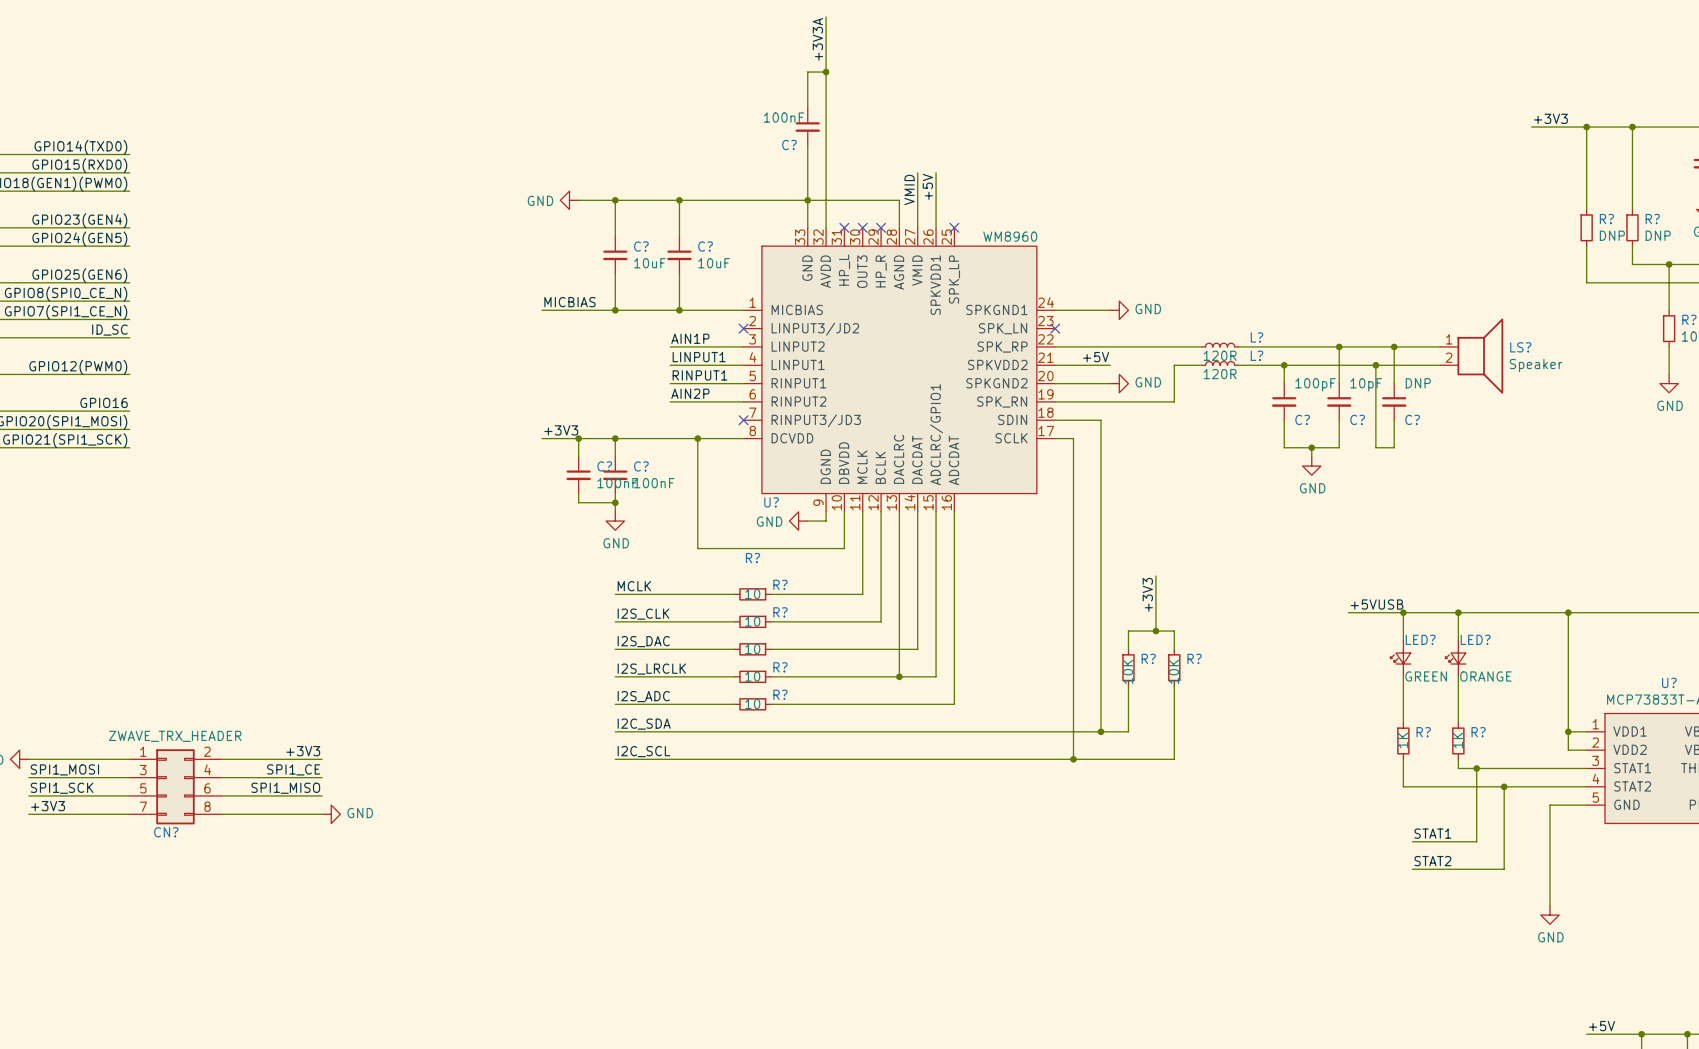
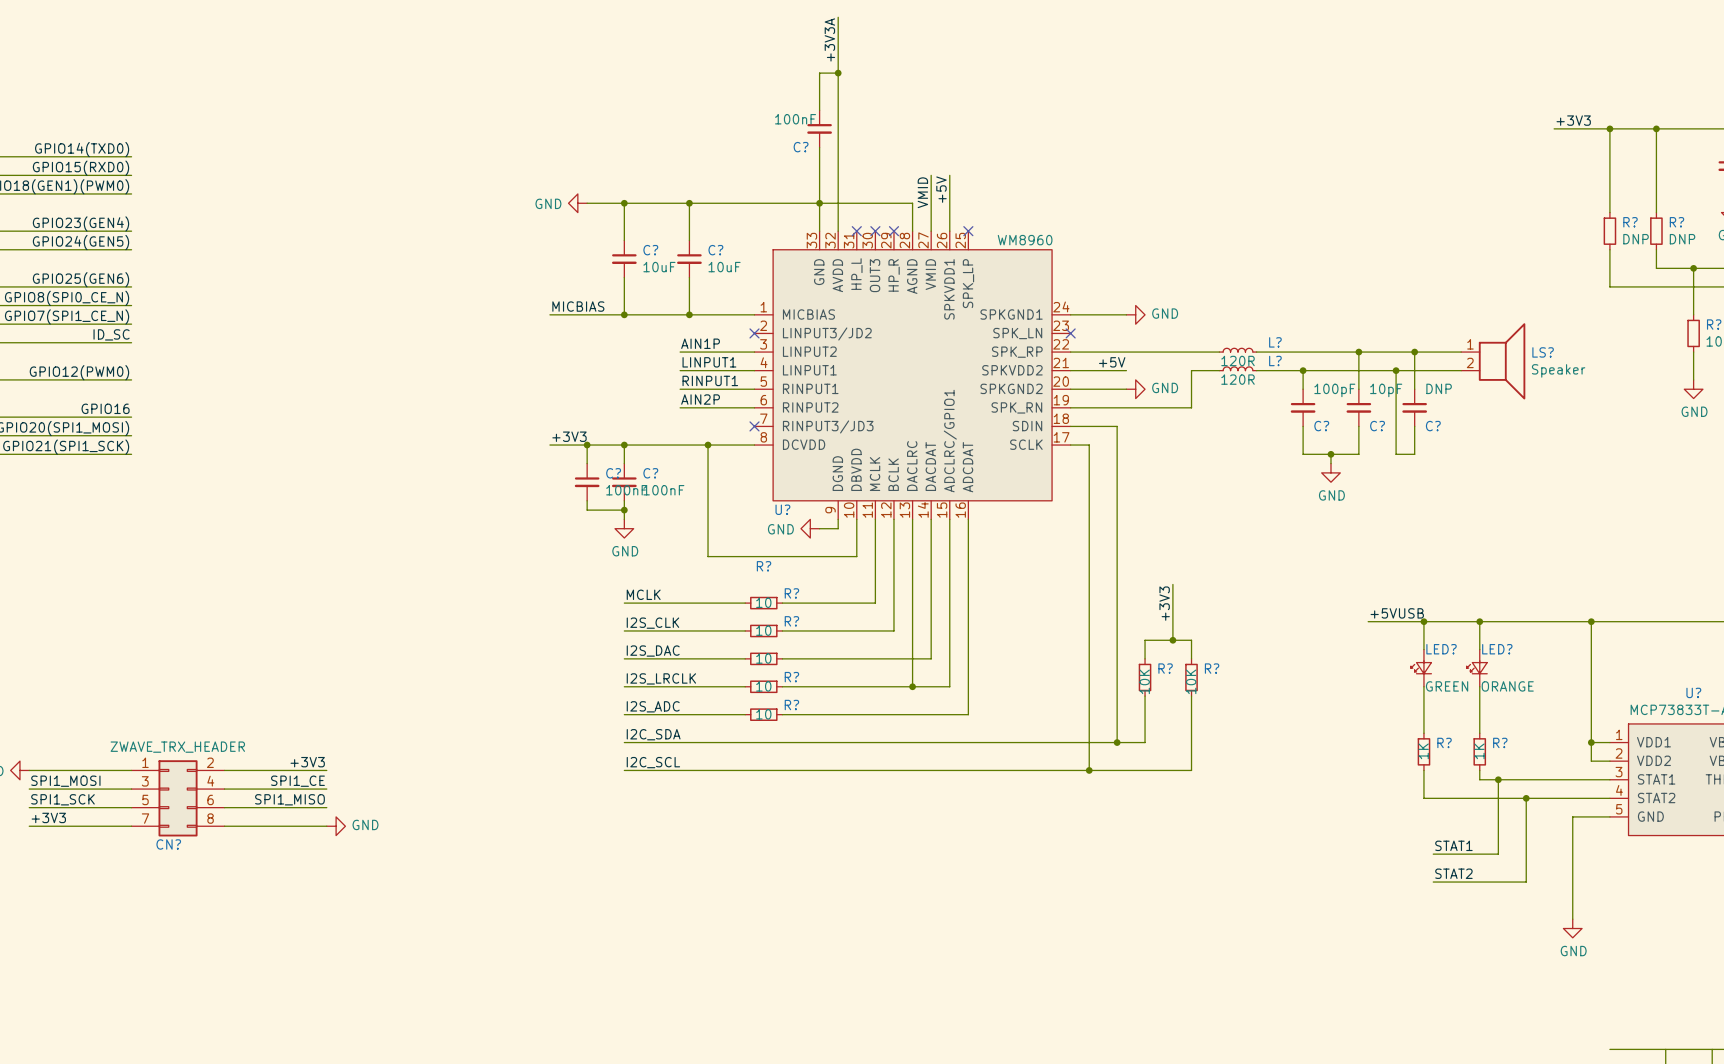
label: +5V (1602, 1026) -> none
junction: (1641, 1034) -> none
junction: (1687, 1034) -> none

